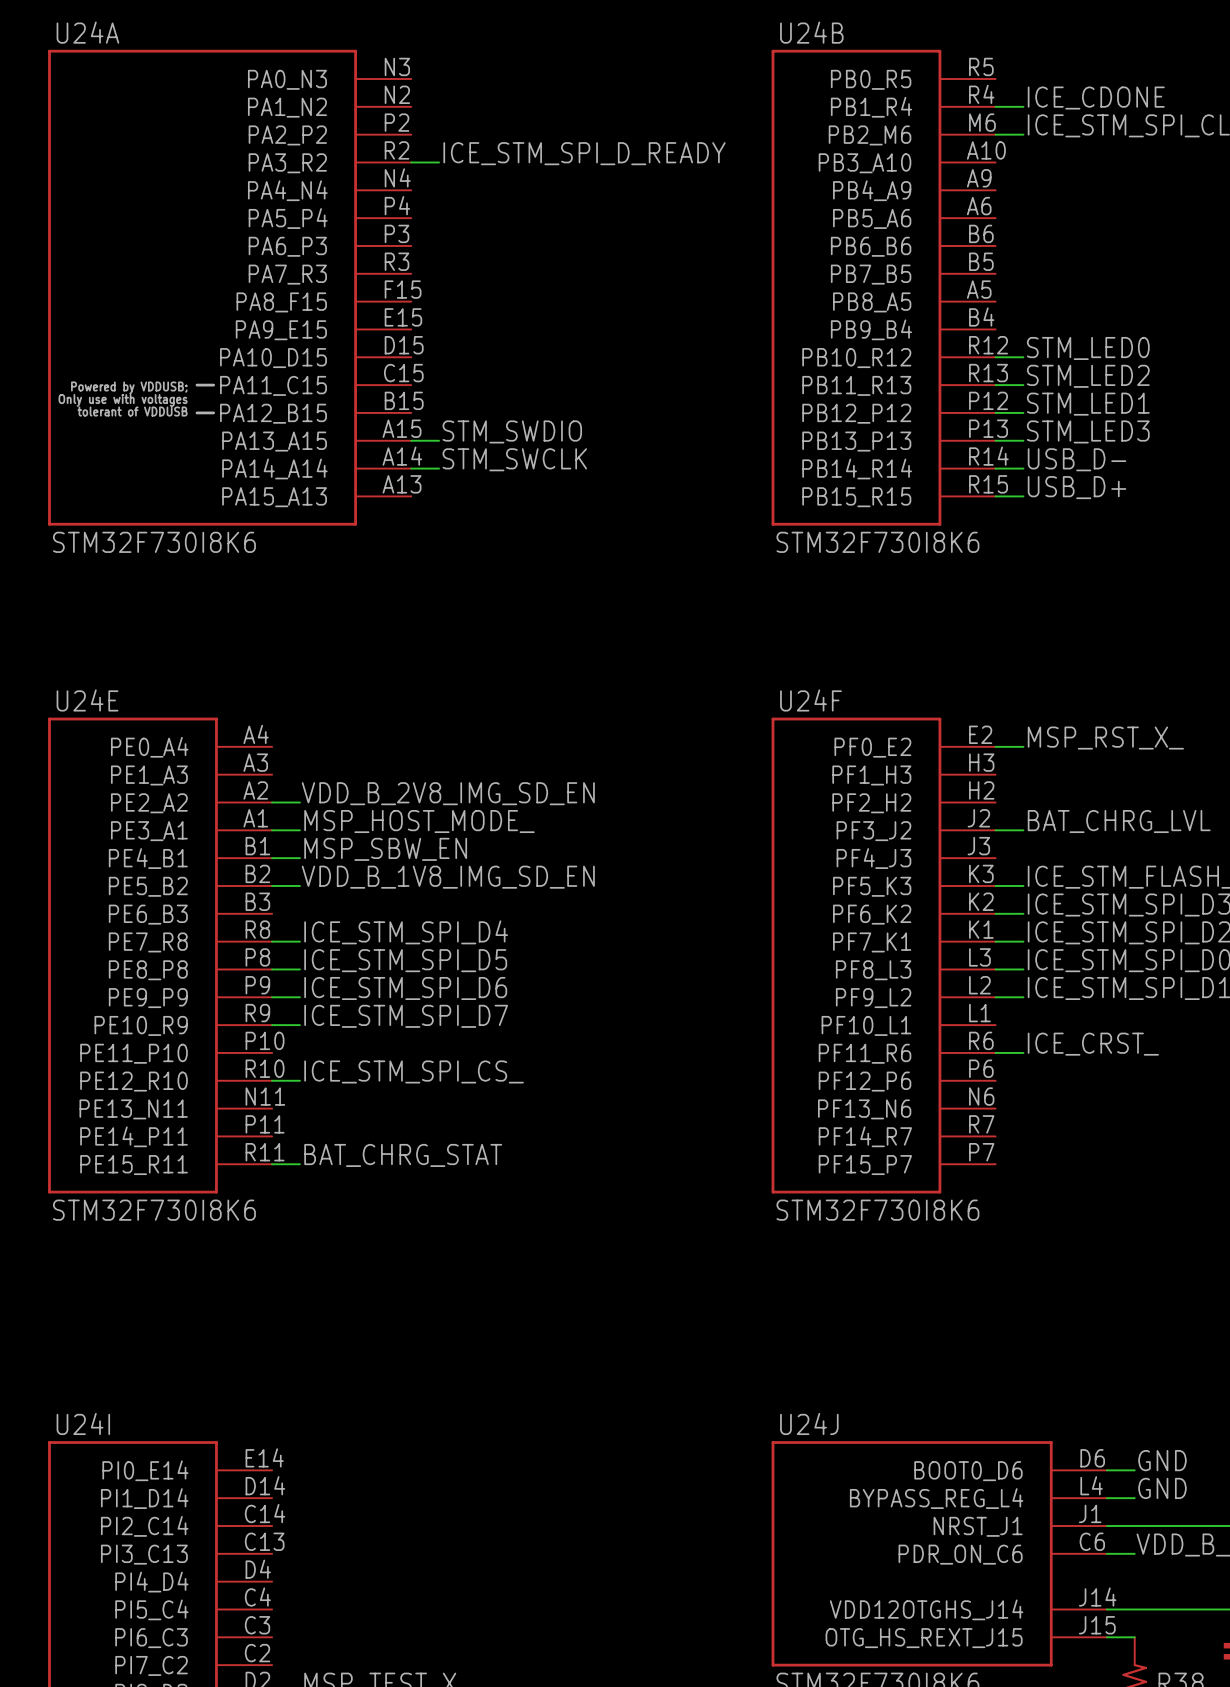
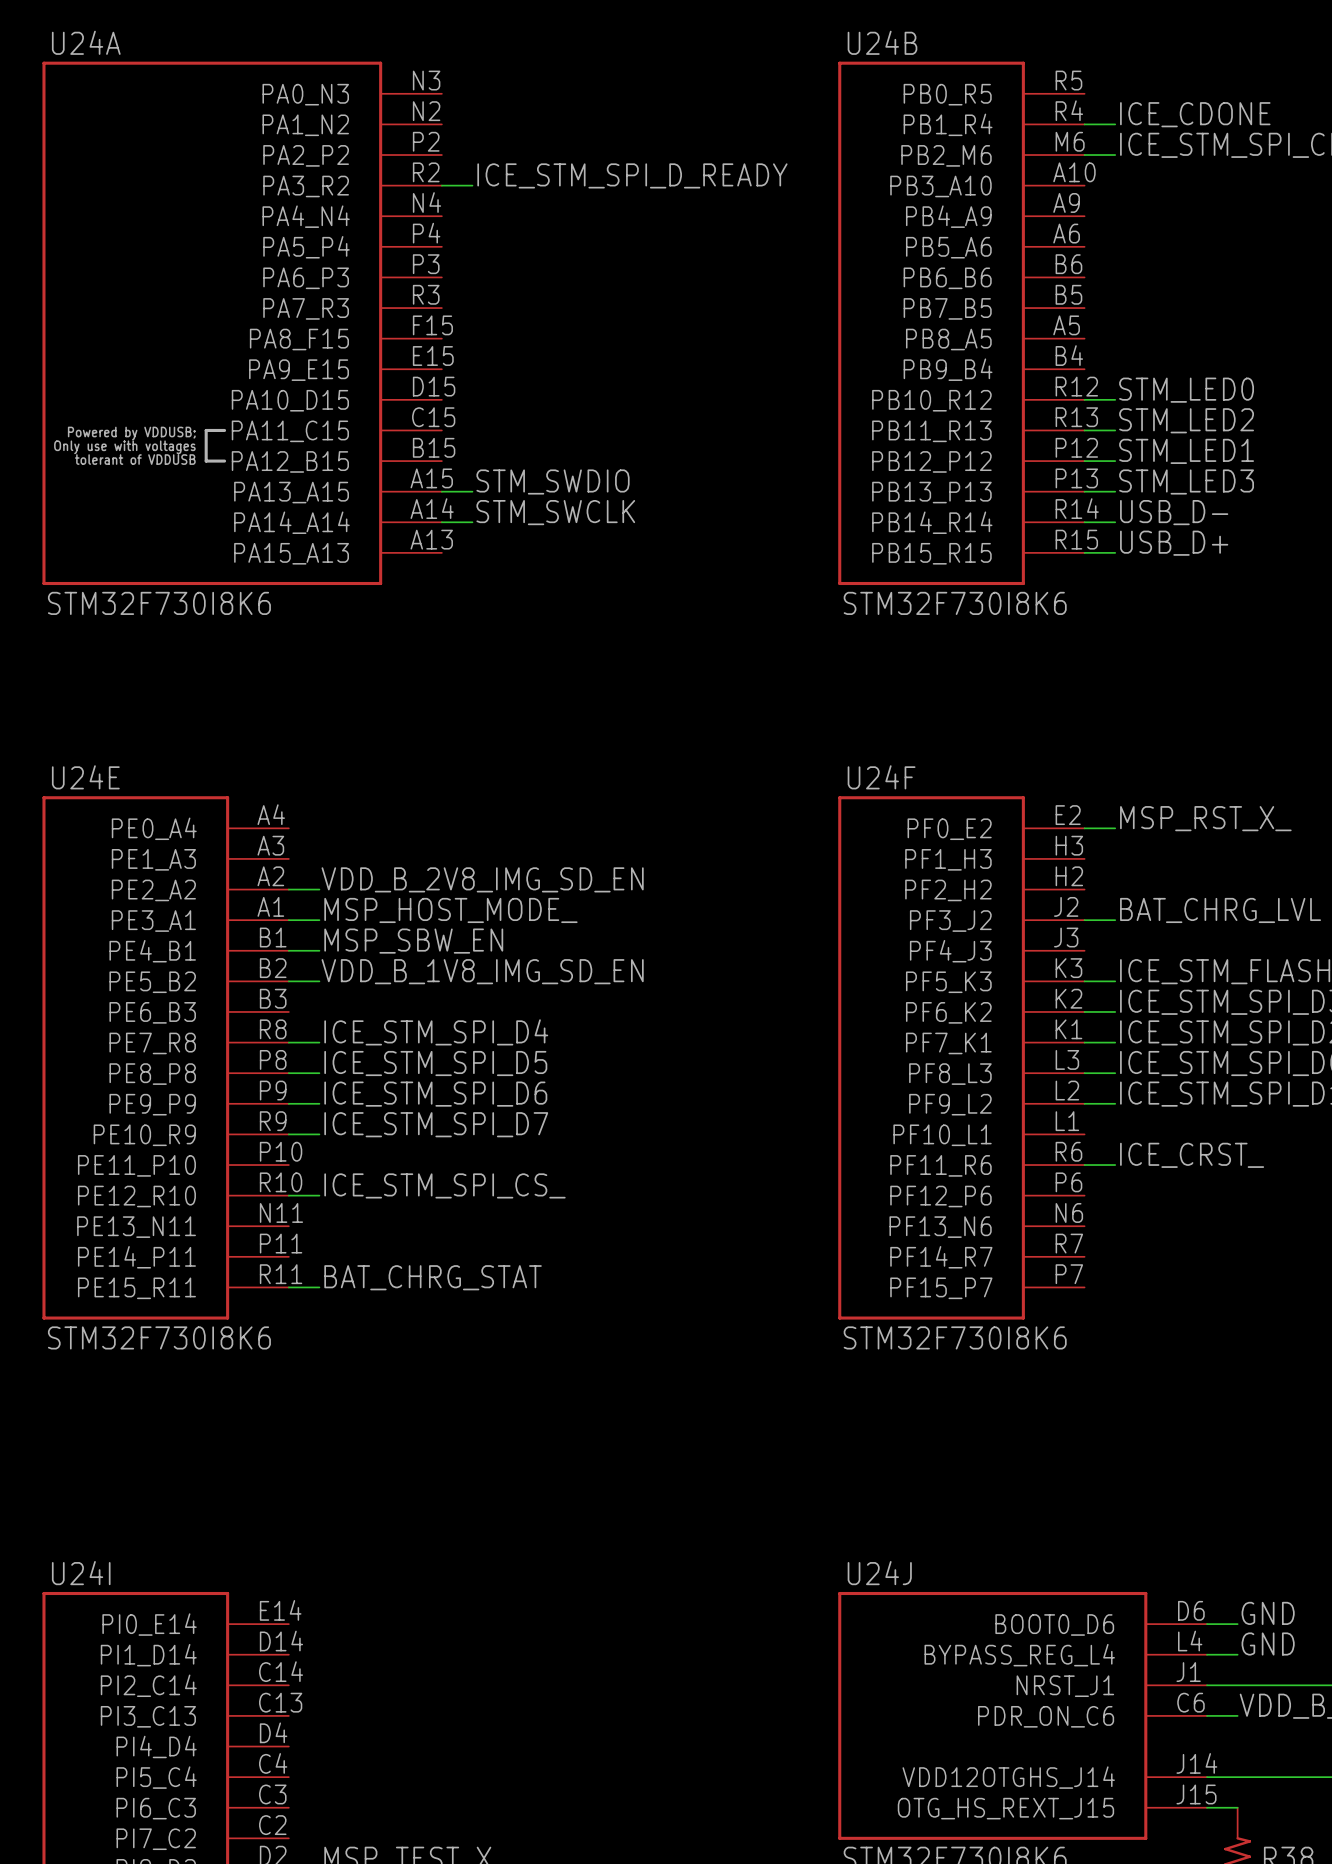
U24A symbol: [48, 49, 412, 526] -> [42, 61, 442, 586]

